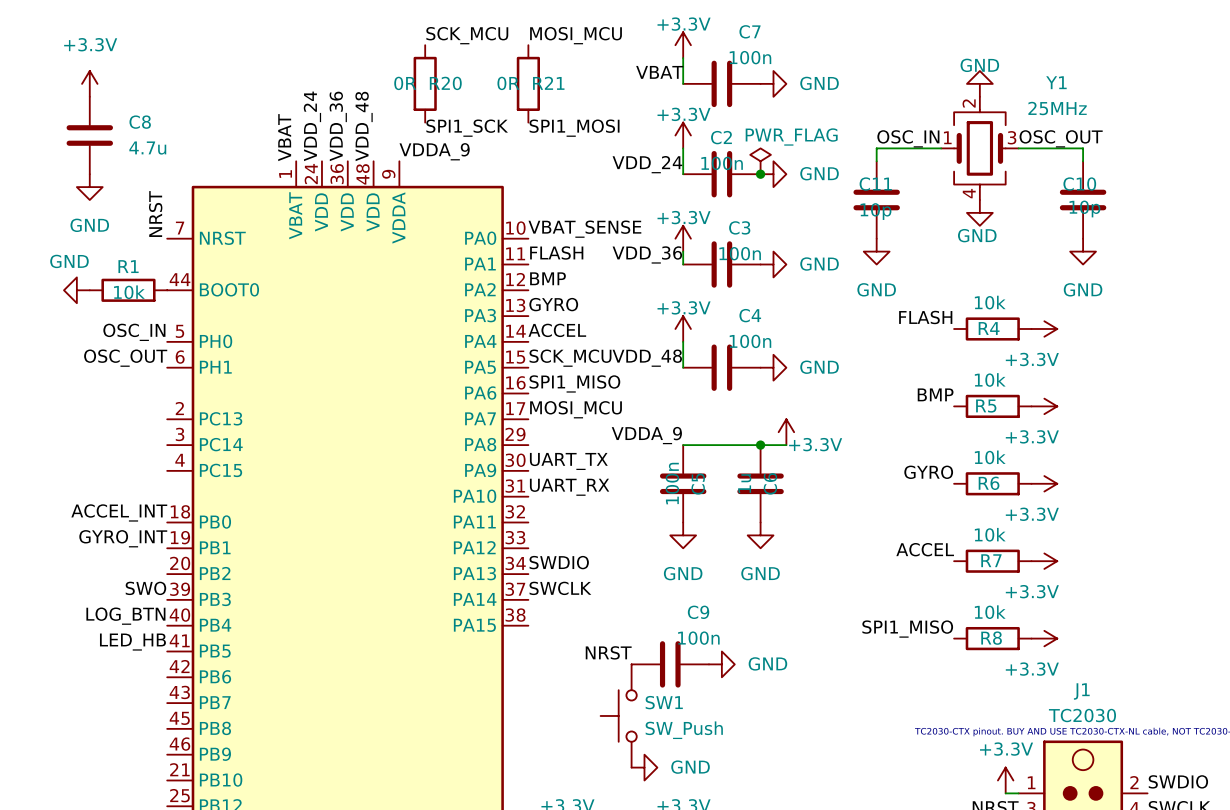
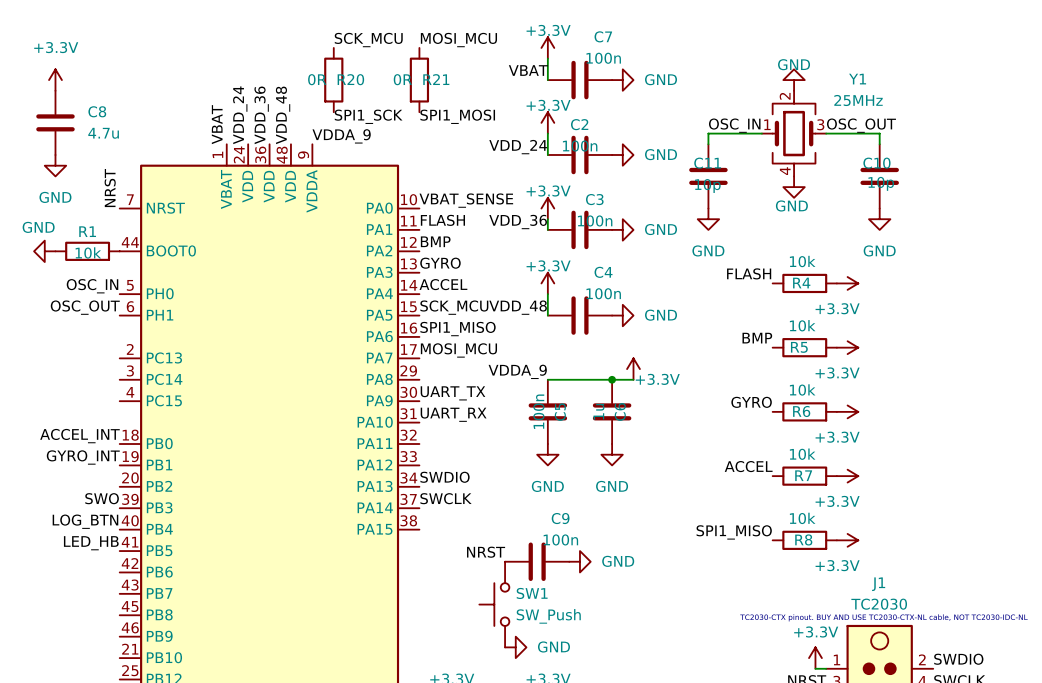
power symbol: PWR_FLAG (760, 161) -> none
junction: (760, 174) -> none

